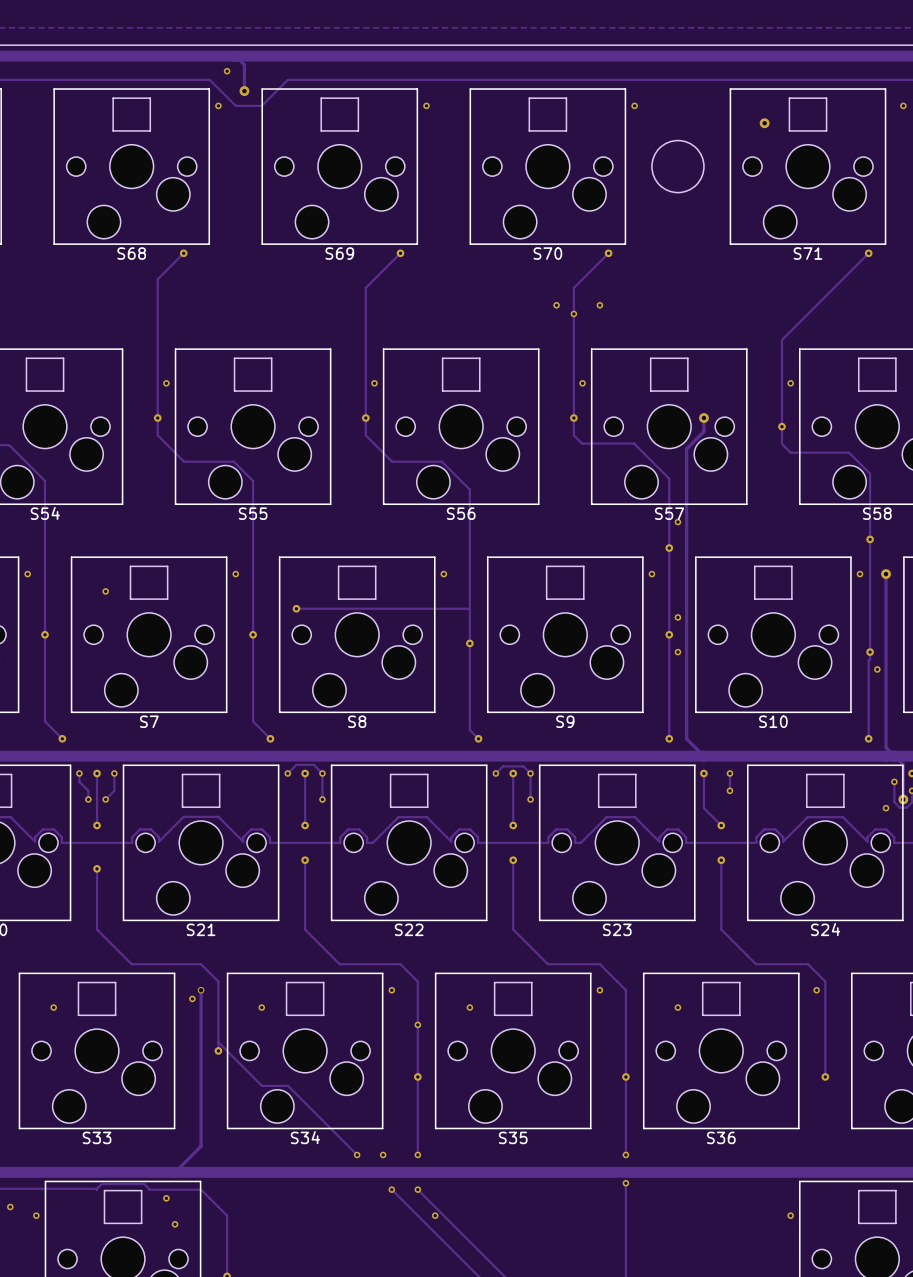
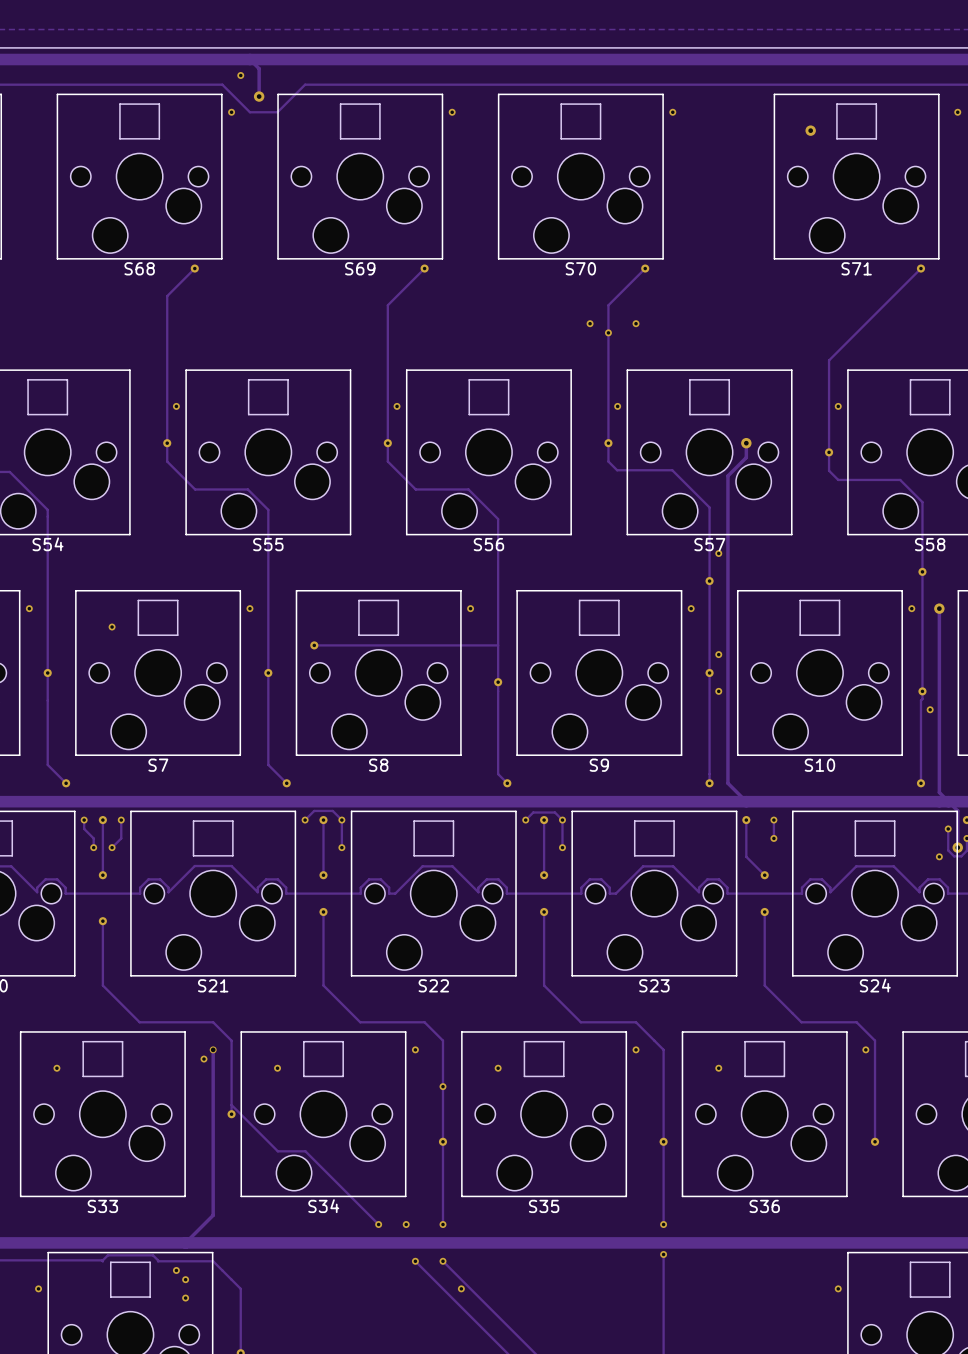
round board edge: [651, 140, 705, 193] -> none
via: (10, 1207) -> none
via: none -> (185, 1279)

